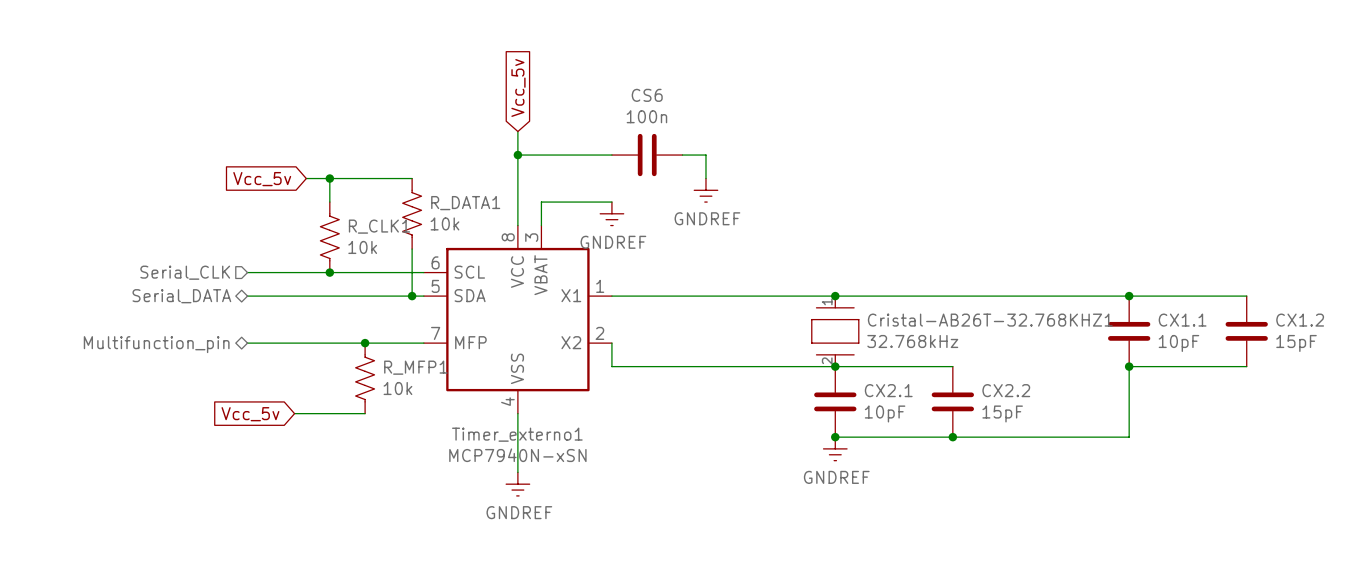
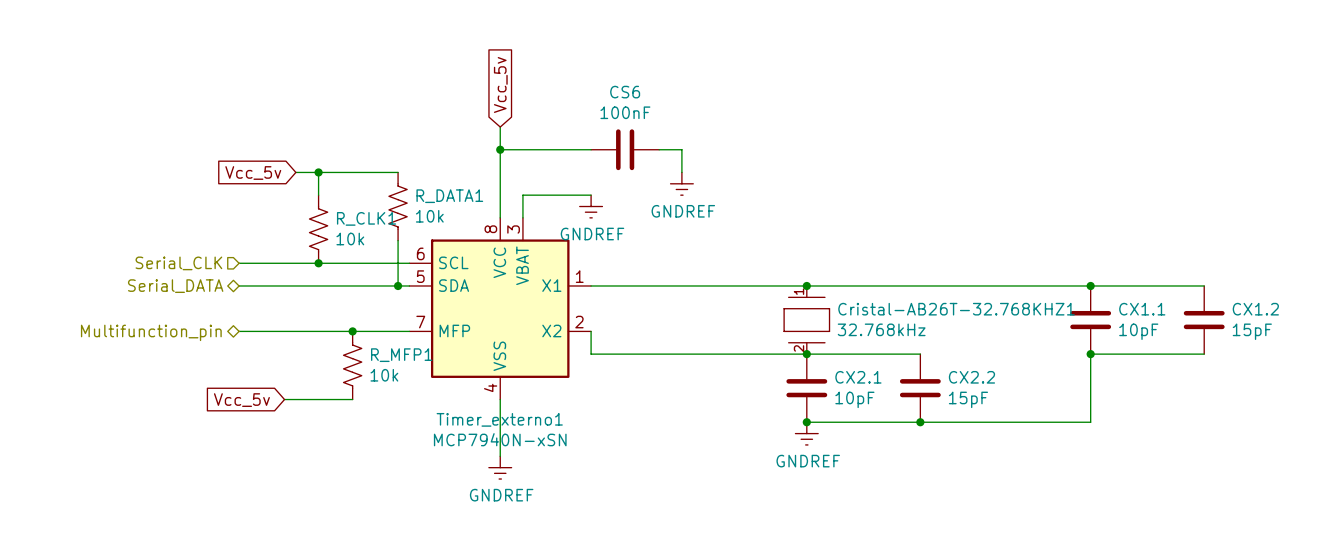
CS6 value: 100n (646, 116) -> 100nF (625, 112)

